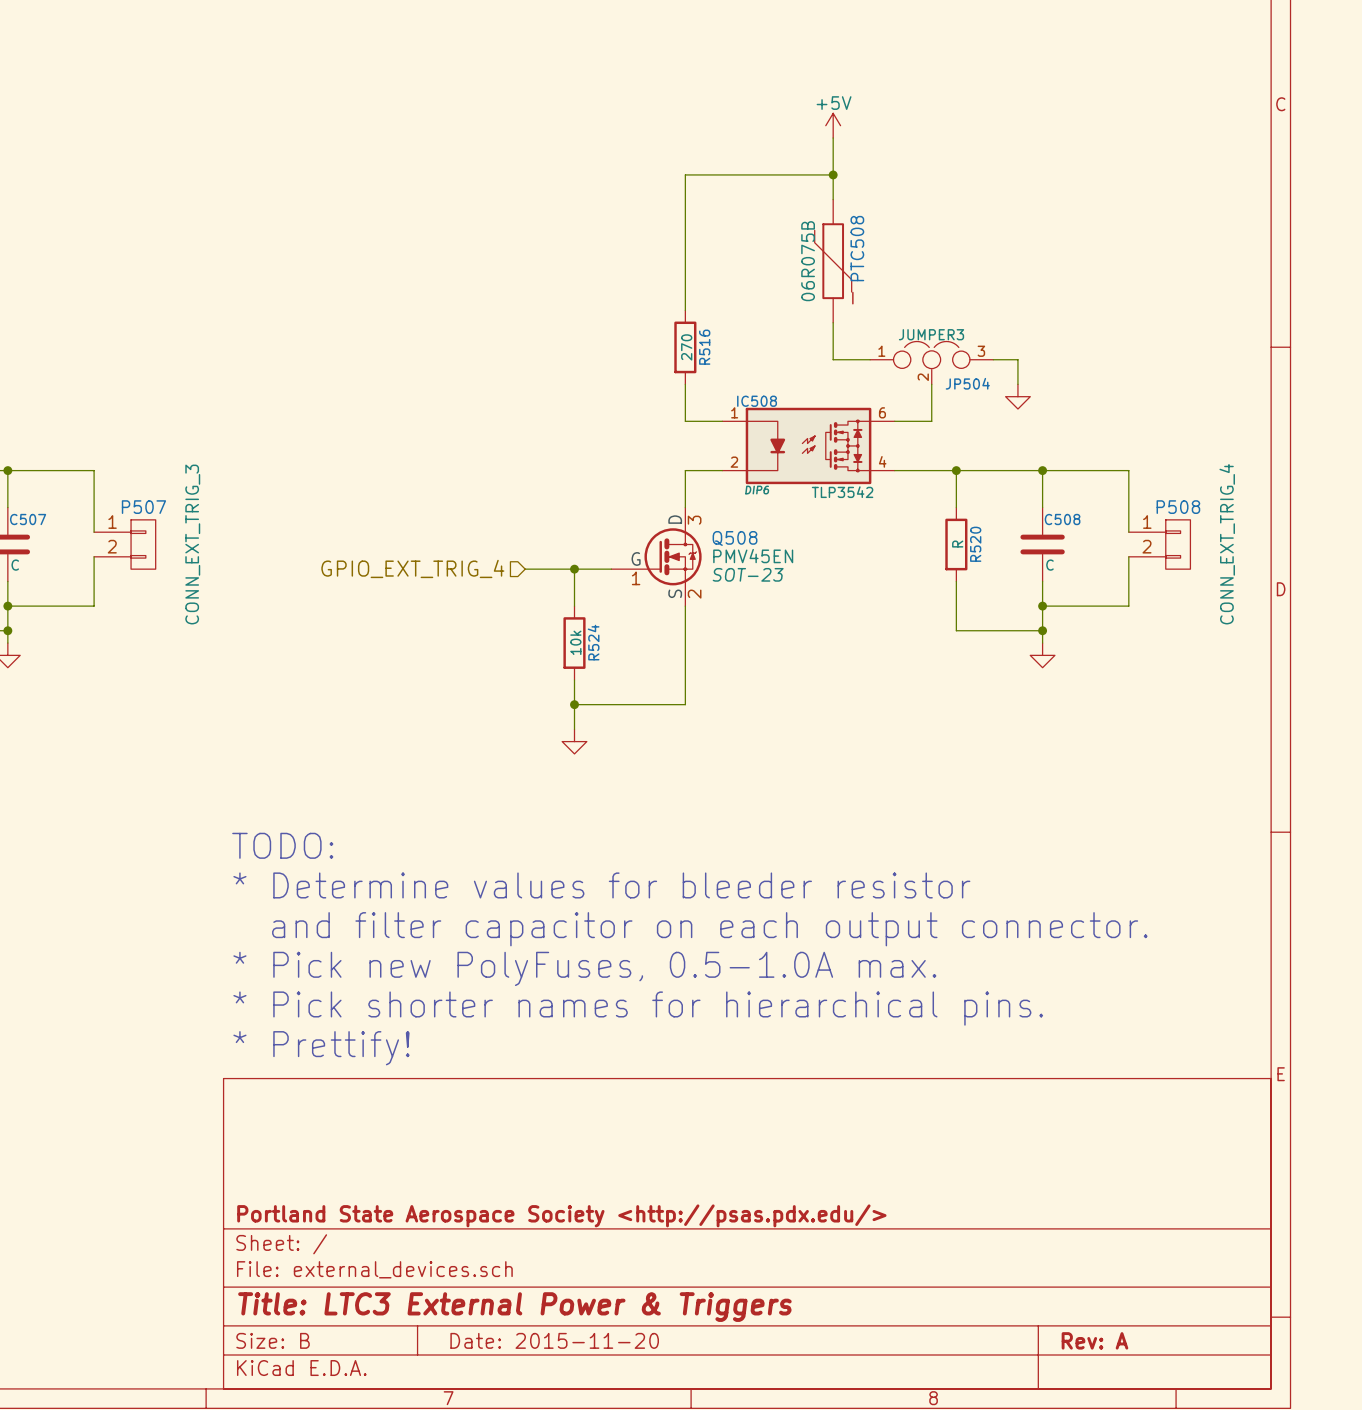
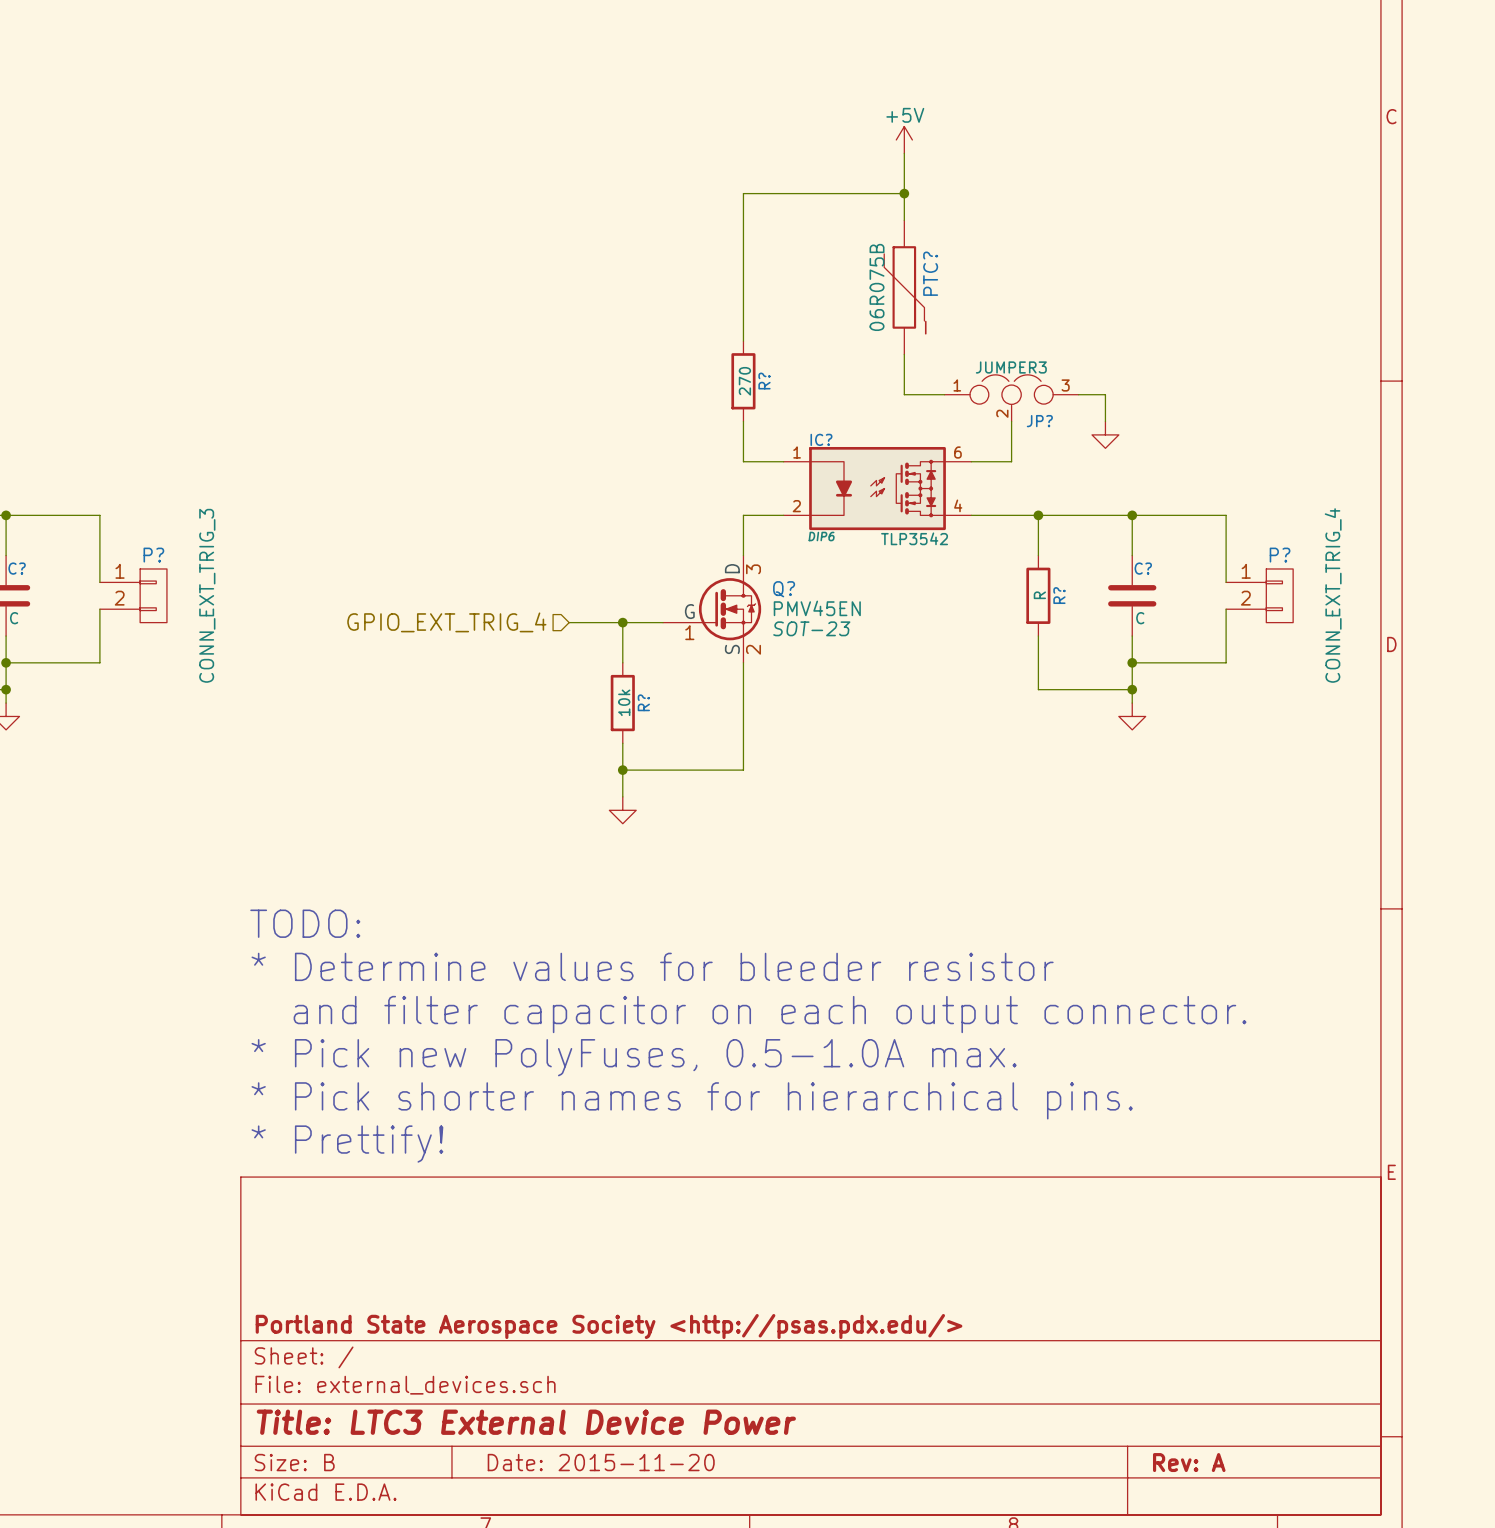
PTC508 name: PTC508 (857, 248) -> PTC? (930, 273)
R516 name: R516 (704, 347) -> R? (764, 381)
JP504 name: JP504 (967, 383) -> JP? (1039, 421)
IC508 name: IC508 (757, 401) -> IC? (821, 439)
P507 name: P507 (143, 507) -> P? (153, 555)
P508 name: P508 (1178, 507) -> P? (1280, 555)
C507 name: C507 (28, 519) -> C? (17, 568)
C508 name: C508 (1062, 519) -> C? (1143, 568)
Q508 name: Q508 (735, 538) -> Q? (784, 589)
R520 name: R520 (975, 544) -> R? (1059, 595)
R524 name: R524 (593, 642) -> R? (643, 702)
title block: Title: LTC3 External Power & Triggers (514, 1307) -> Title: LTC3 External Device Power (526, 1422)

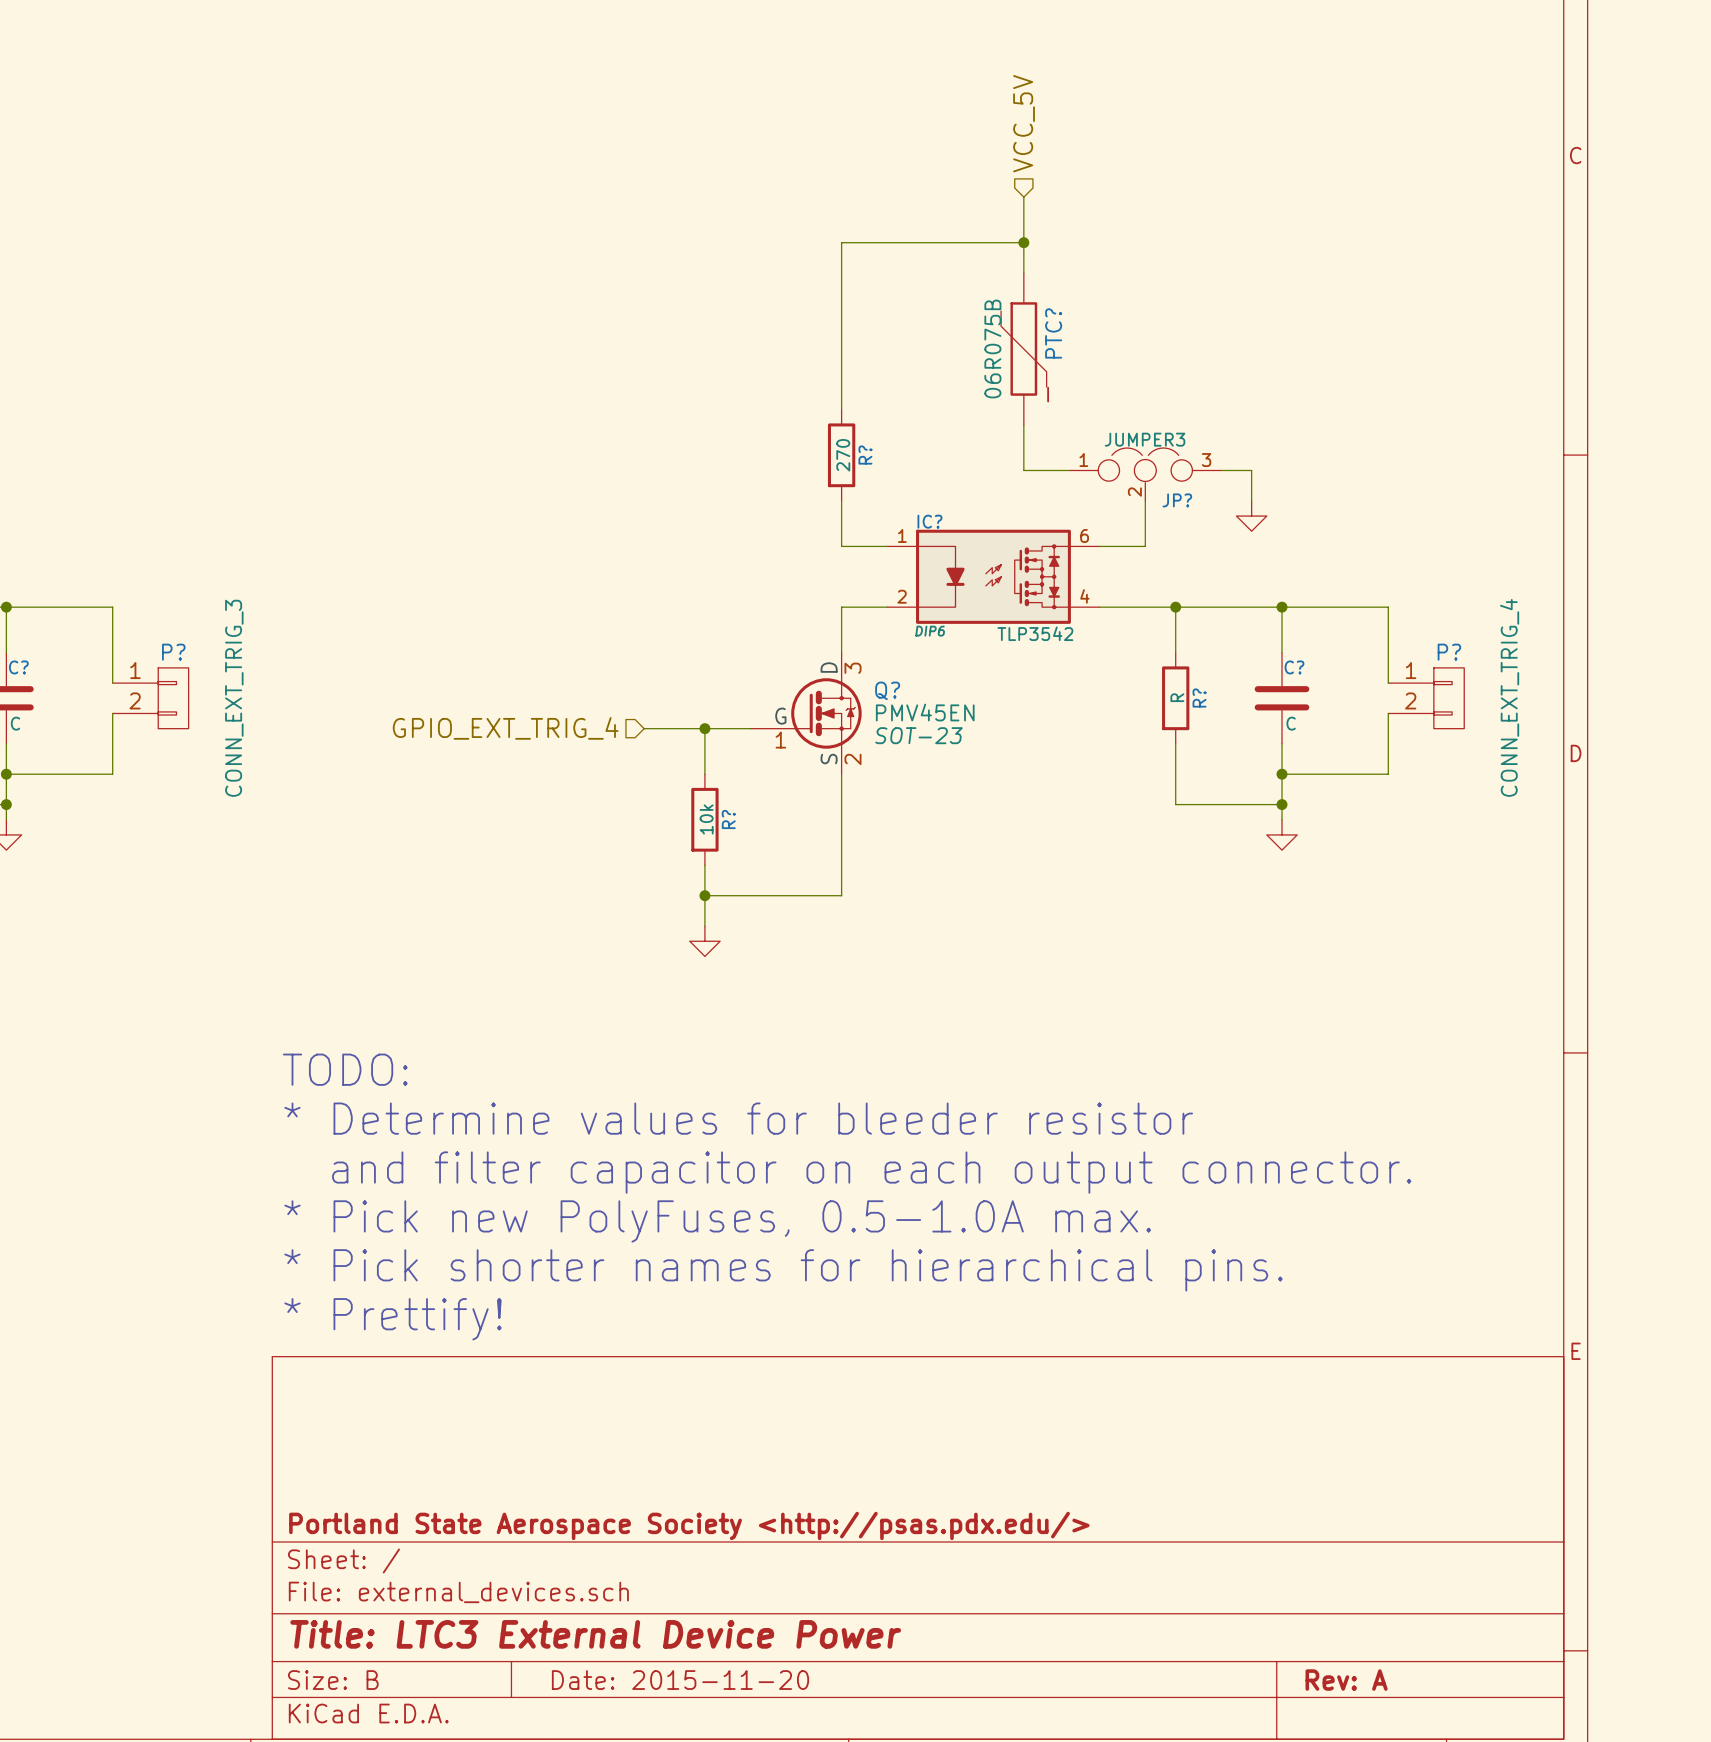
hierarchical label: none -> VCC_5V (1024, 123)
power symbol: +5V (904, 139) -> none

